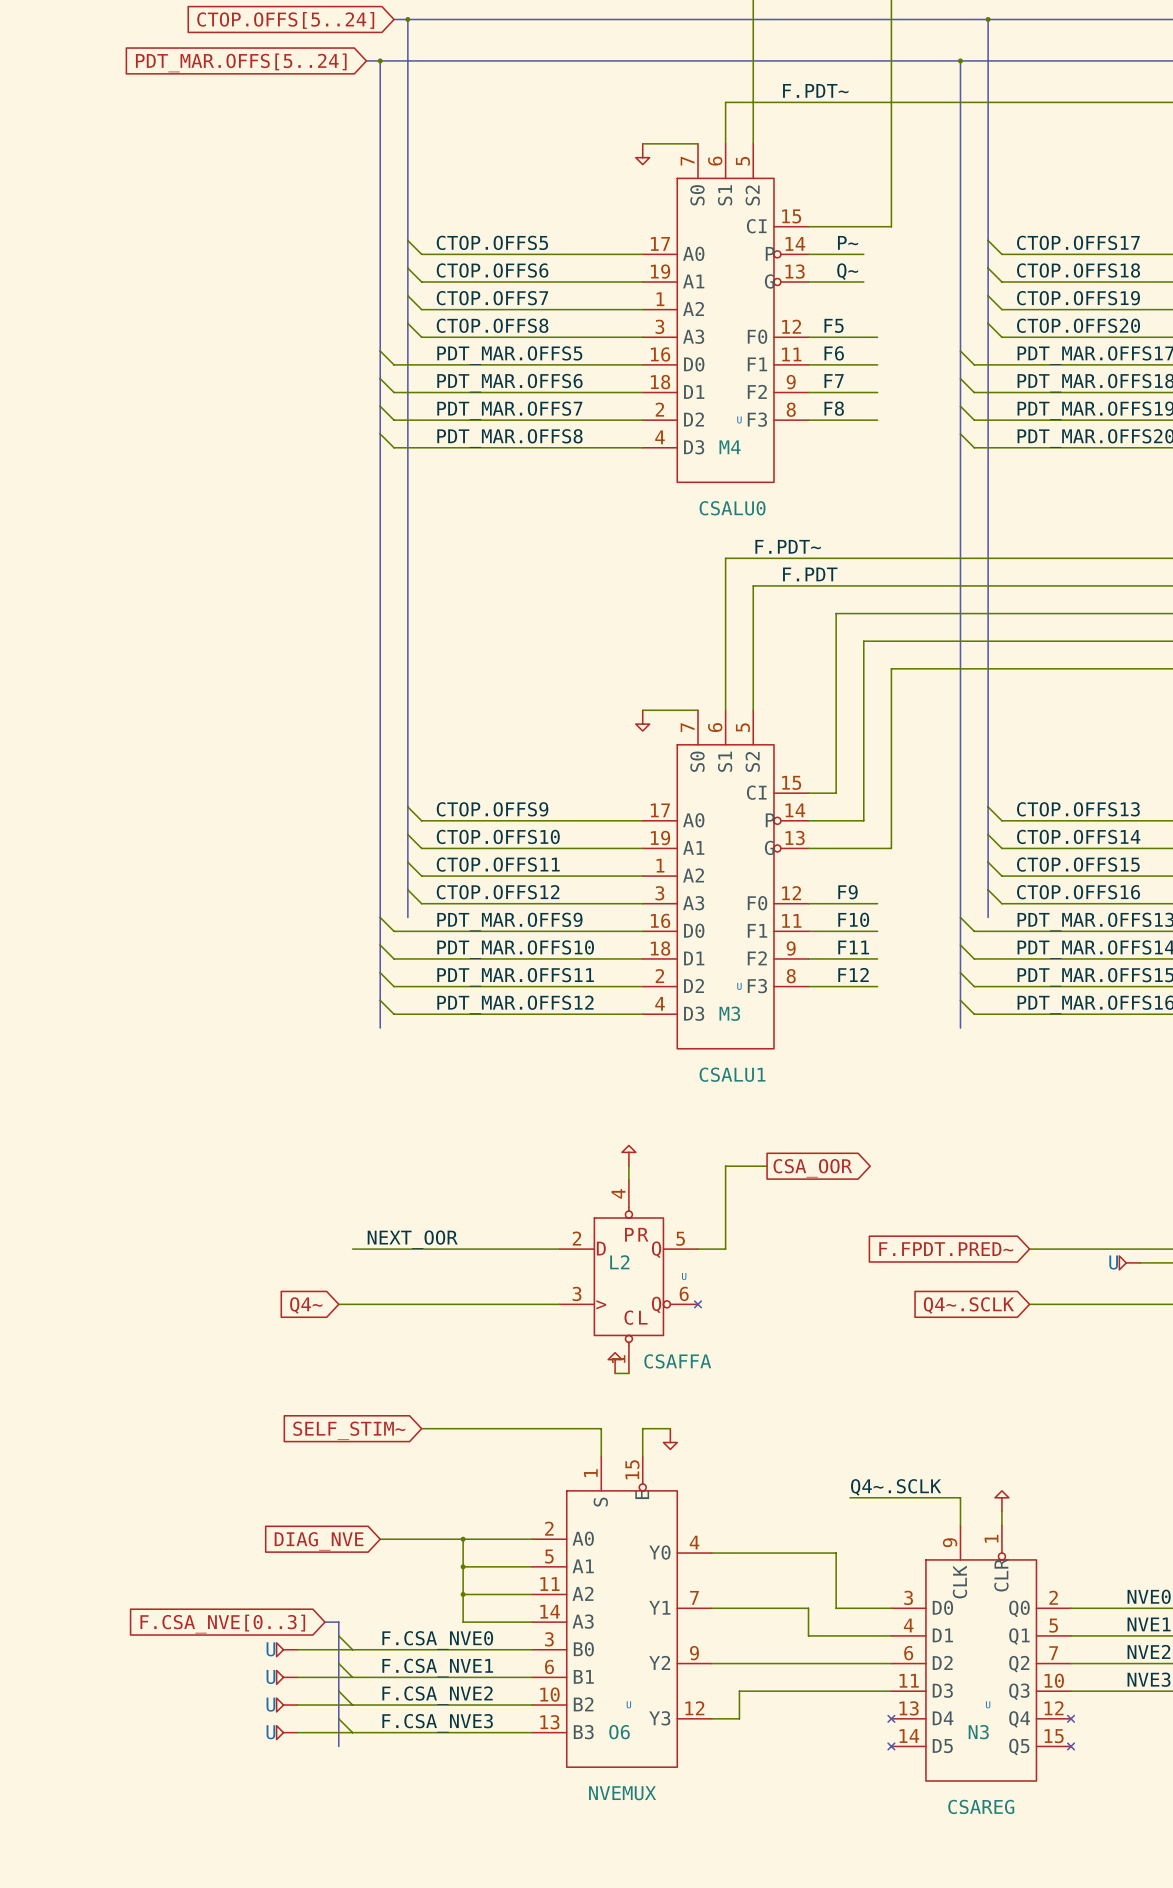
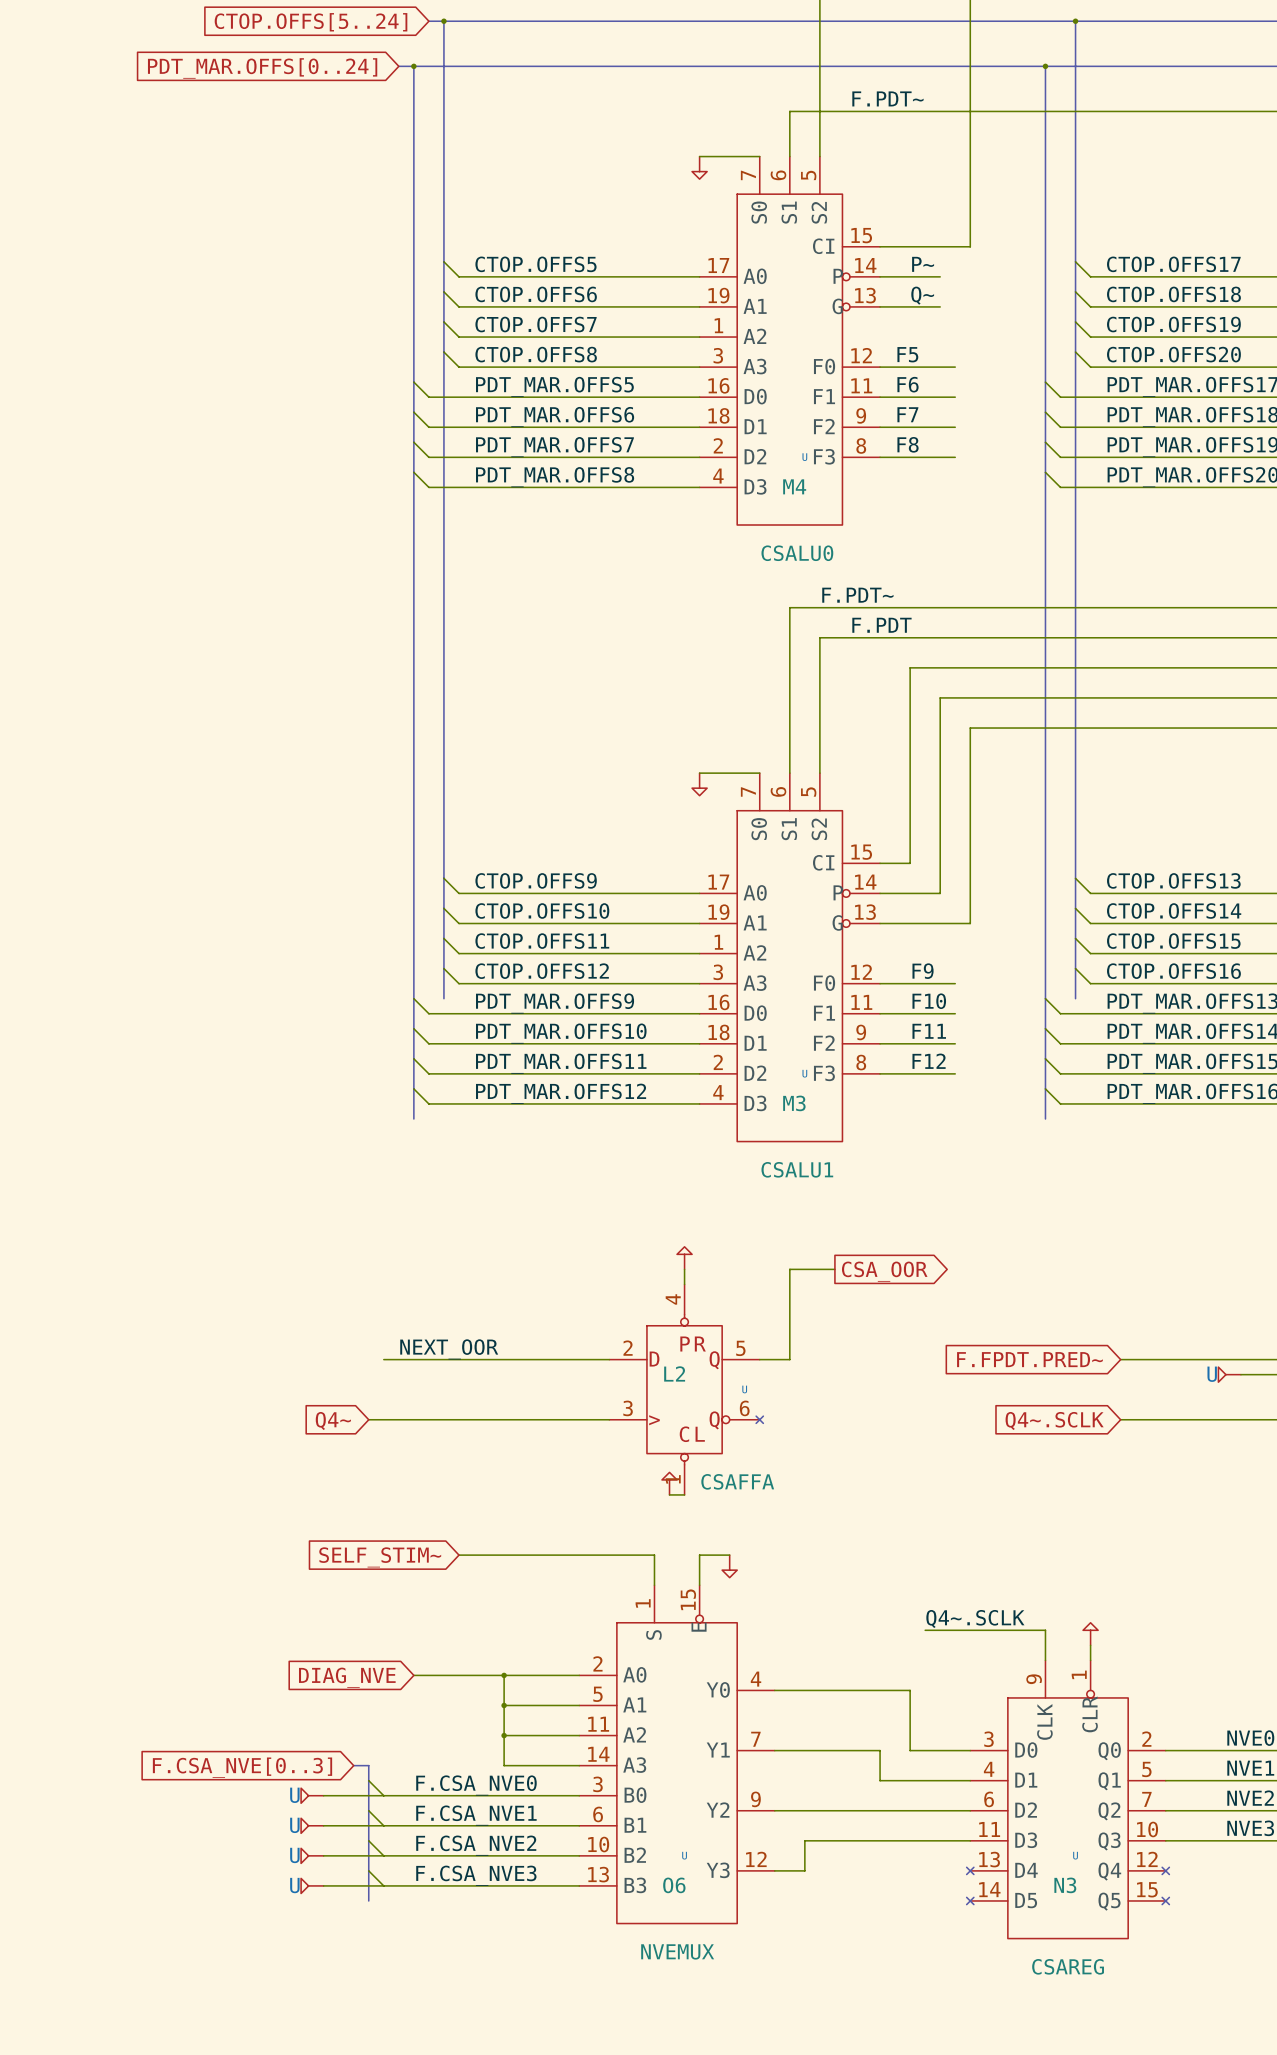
global label: PDT_MAR.OFFS[5..24] (241, 62) -> PDT_MAR.OFFS[0..24] (262, 68)

